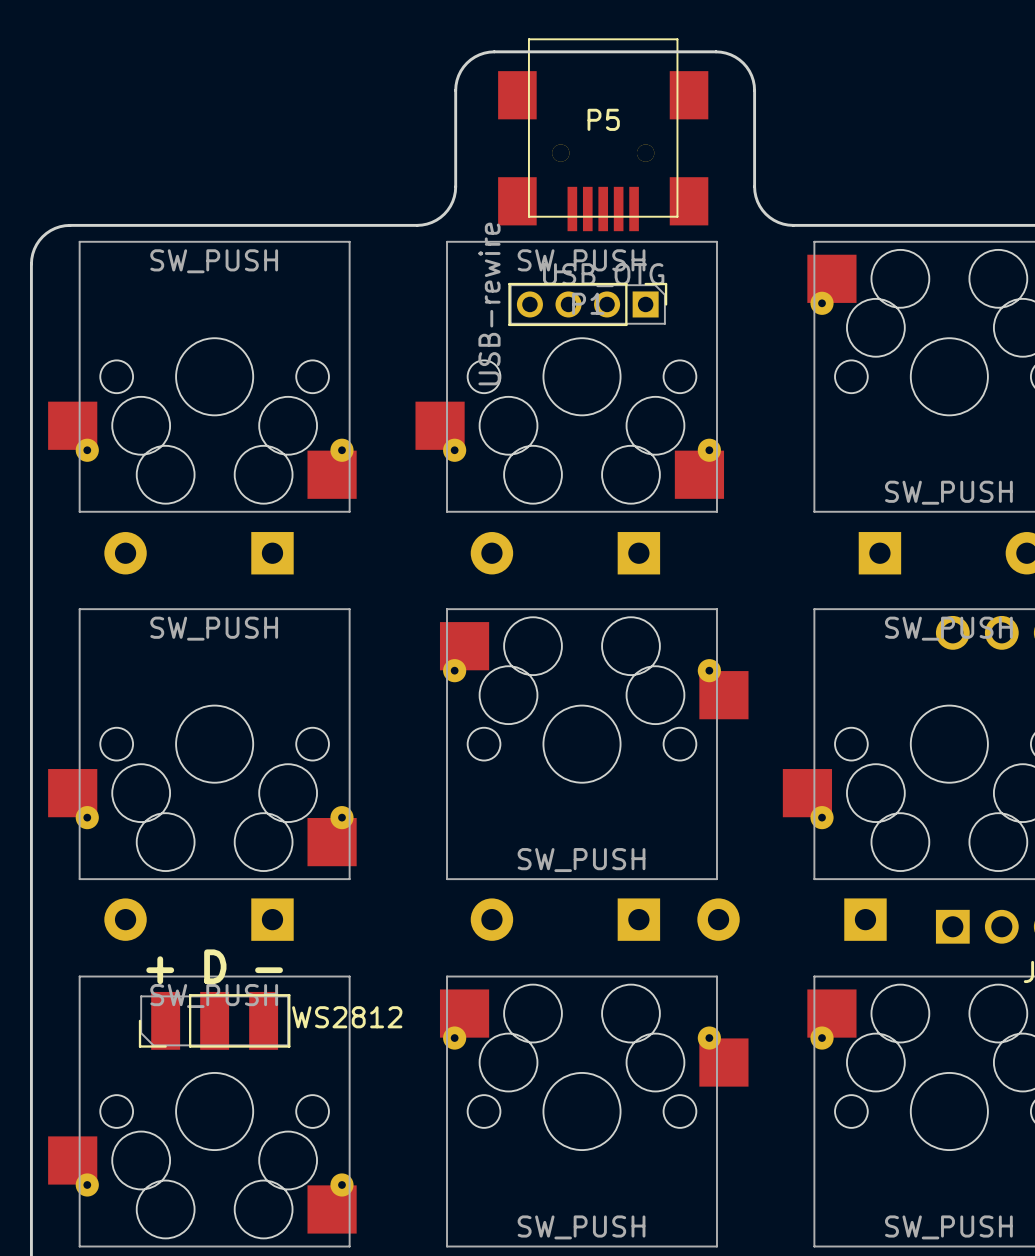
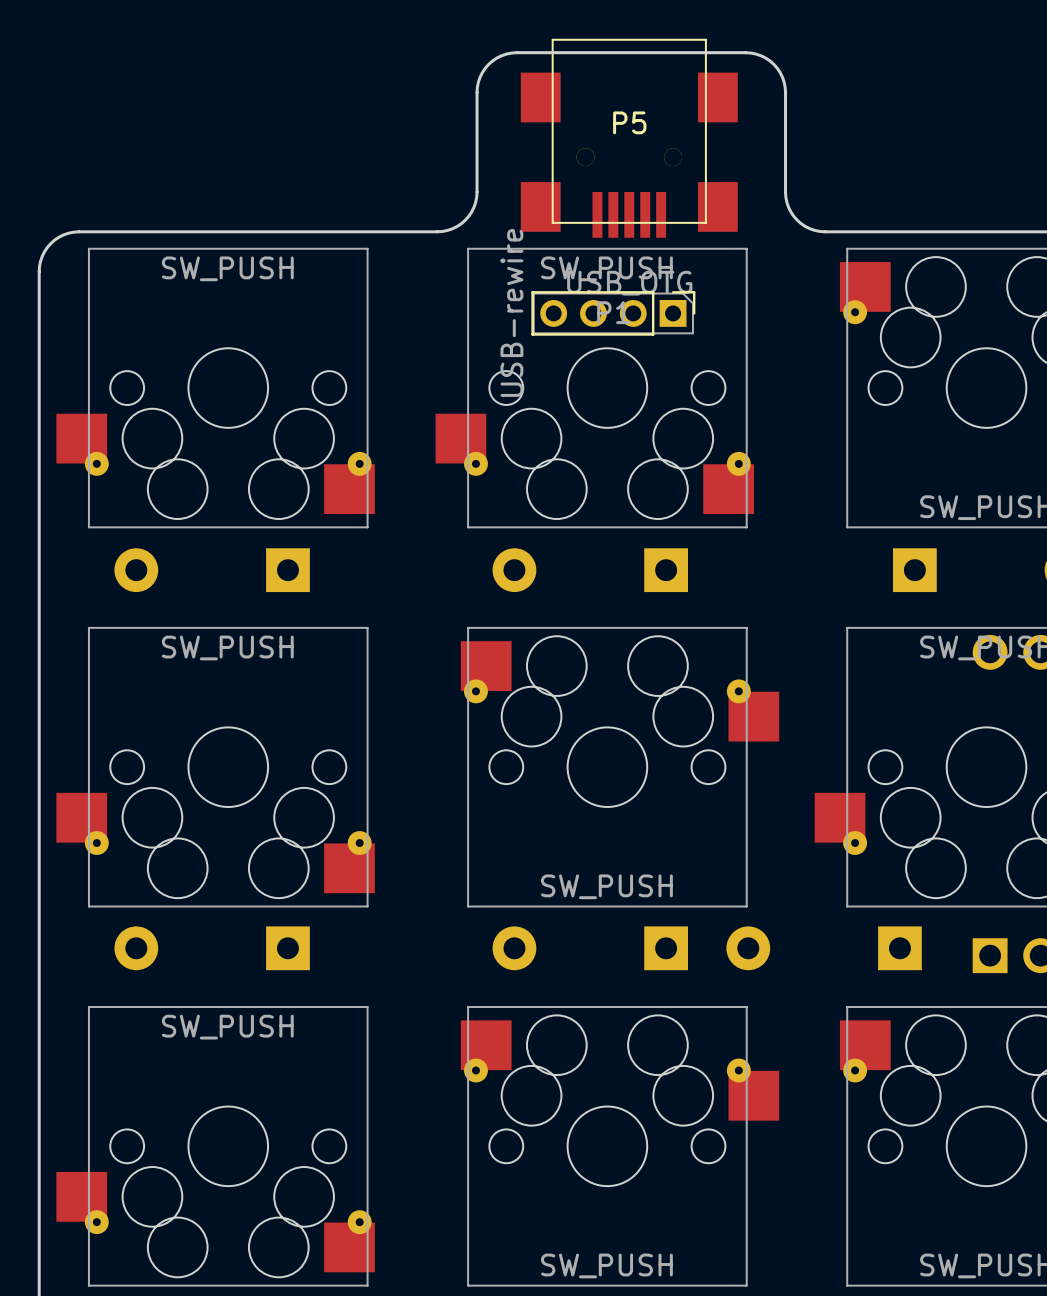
text: + D - (214, 966) -> none
part: WS2812 (214, 1020) -> none

